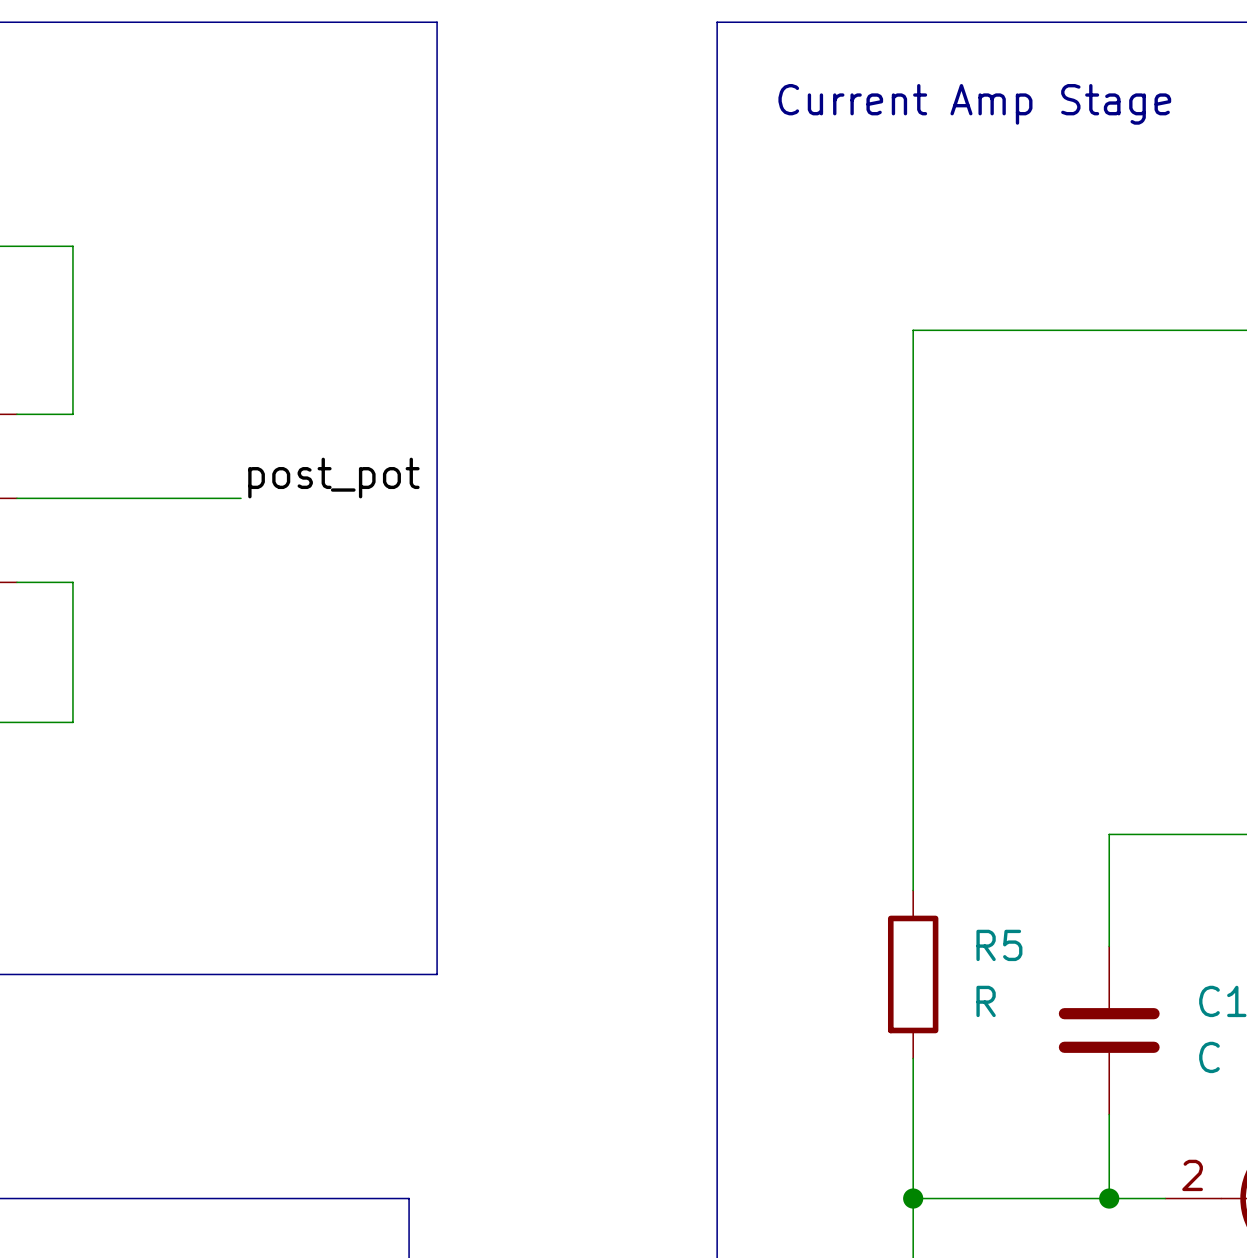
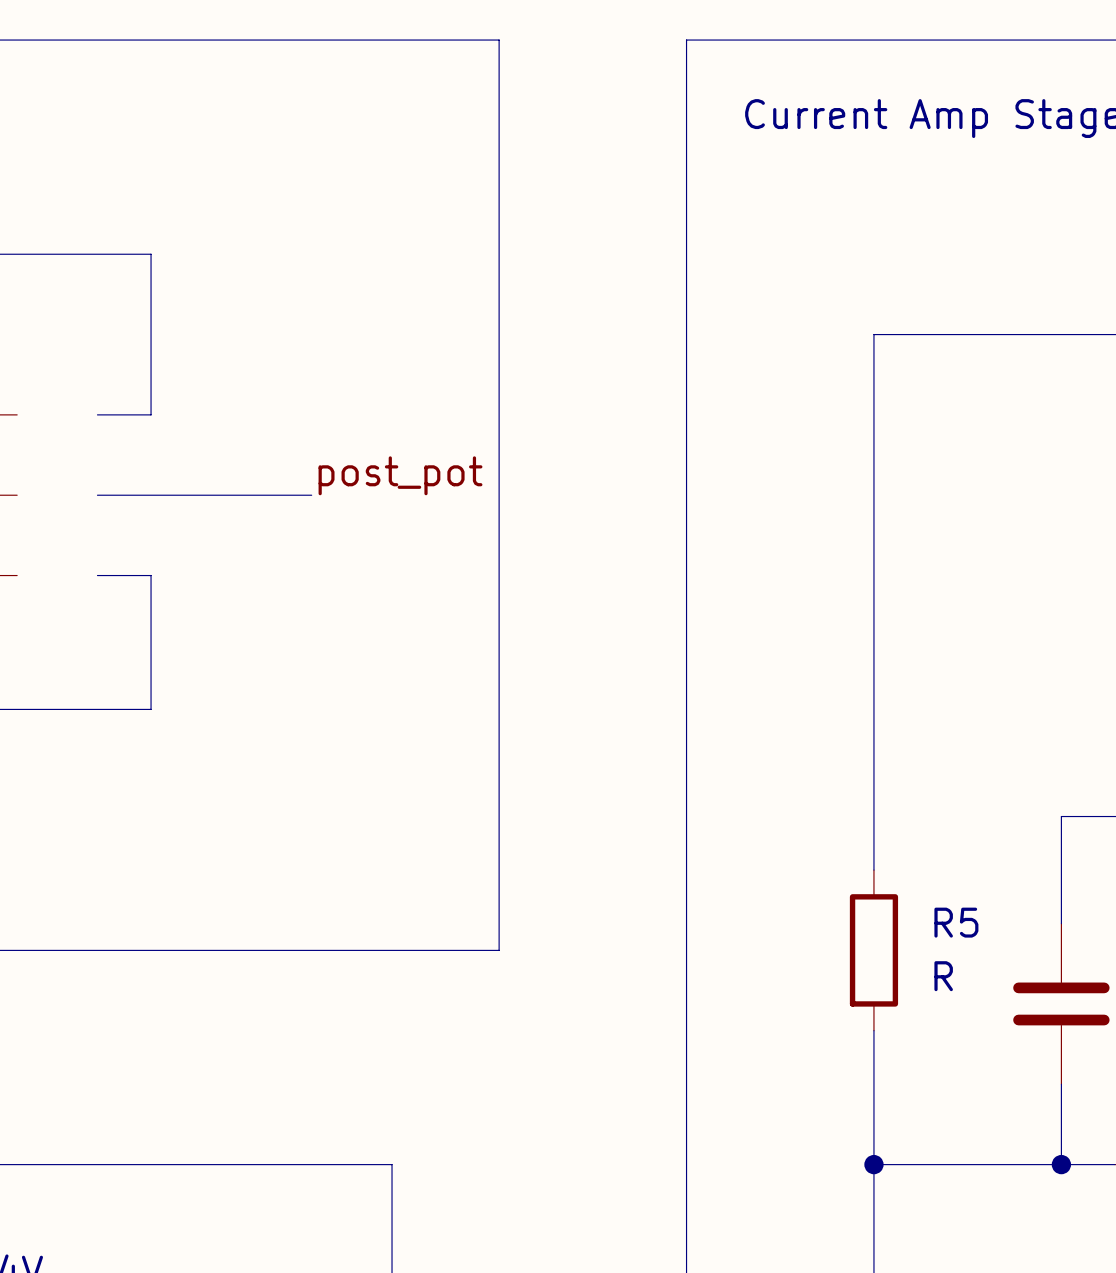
bus: (437, 22) (437, 974) -> (418, 40) (499, 40) (499, 950) (418, 950)
wire: (72, 246) (72, 414) (16, 414) -> (70, 254) (151, 254) (151, 414) (97, 414)
label position: post_pot (333, 478) -> post_pot (400, 475)
wire: (16, 498) (100, 498) -> (231, 495) (311, 495)
wire: (16, 582) (72, 582) (72, 722) -> (97, 575) (151, 575) (151, 709) (70, 709)

